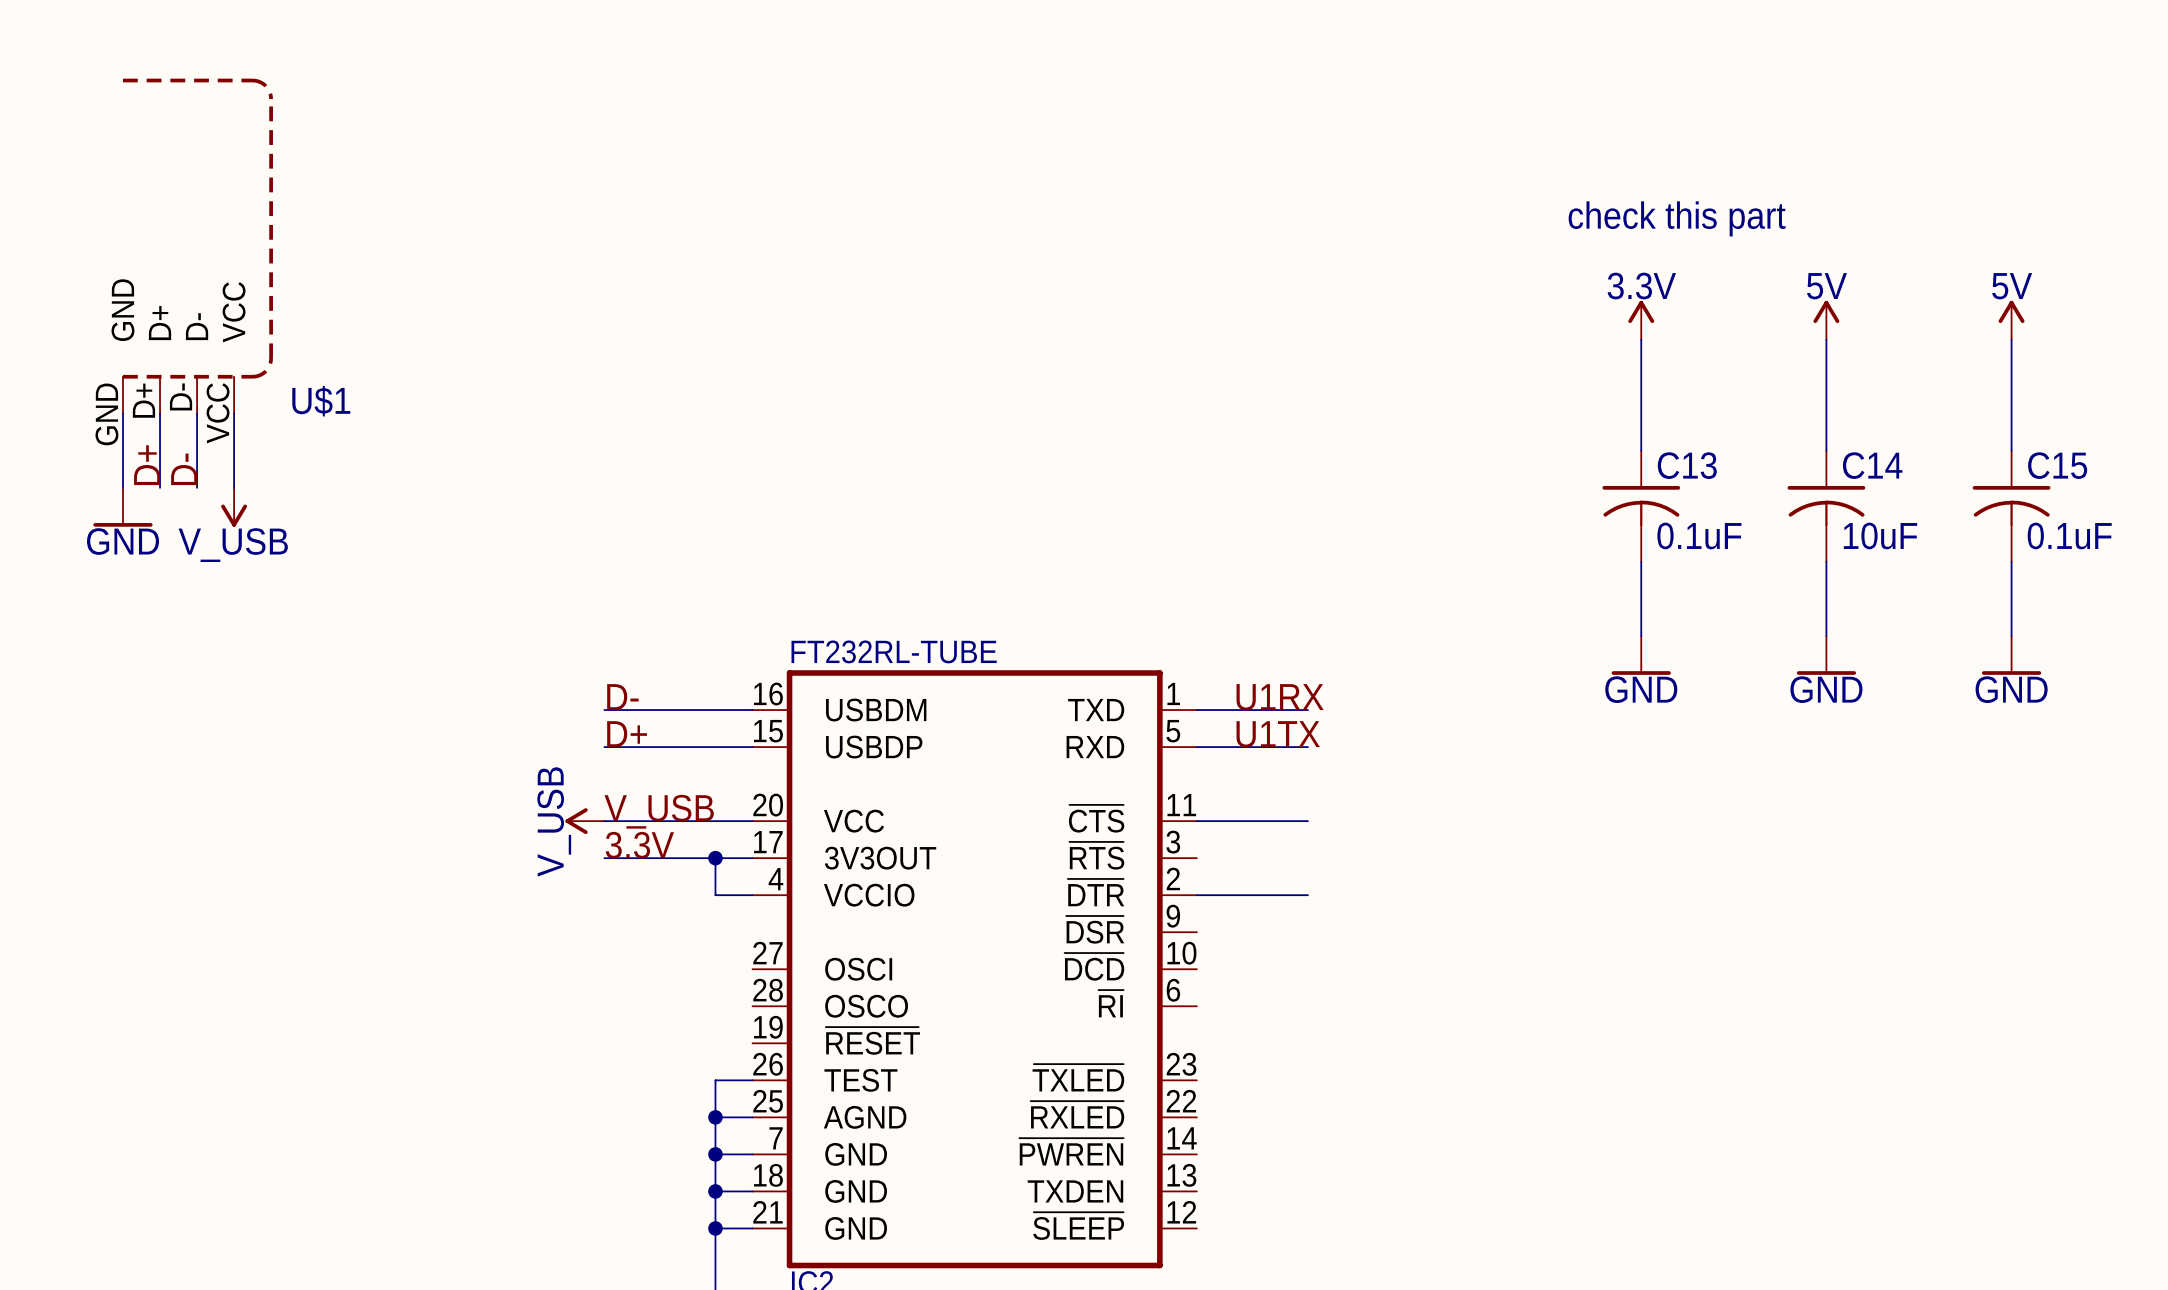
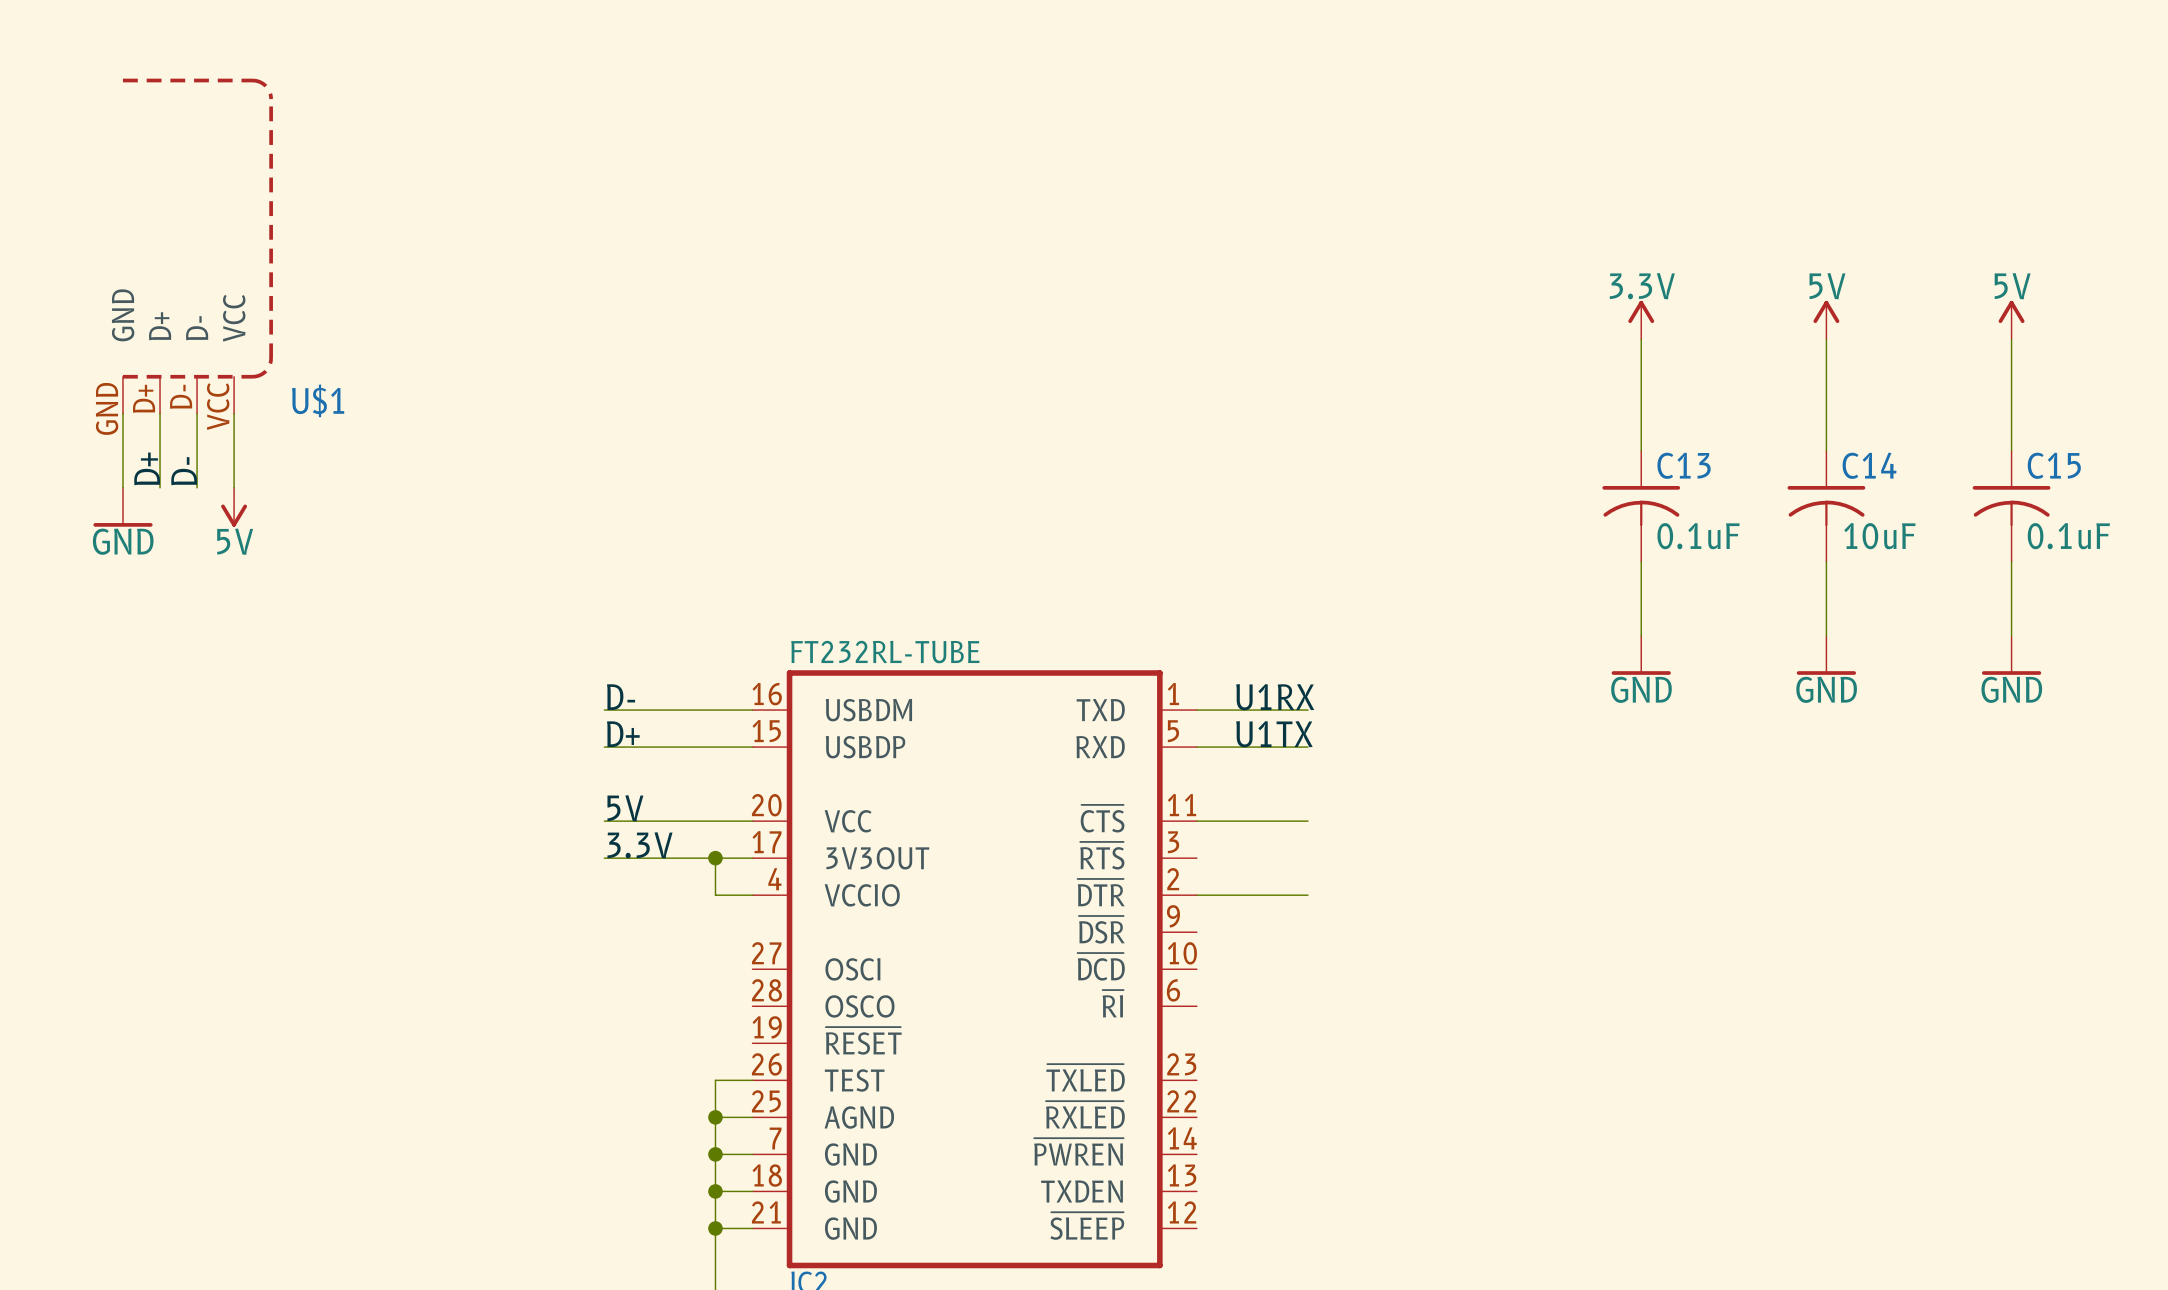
text: check this part (1677, 218) -> none
power symbol: V_USB (234, 507) -> 5V (234, 507)
label: V_USB (659, 811) -> 5V (625, 808)
power symbol: V_USB (584, 821) -> none

